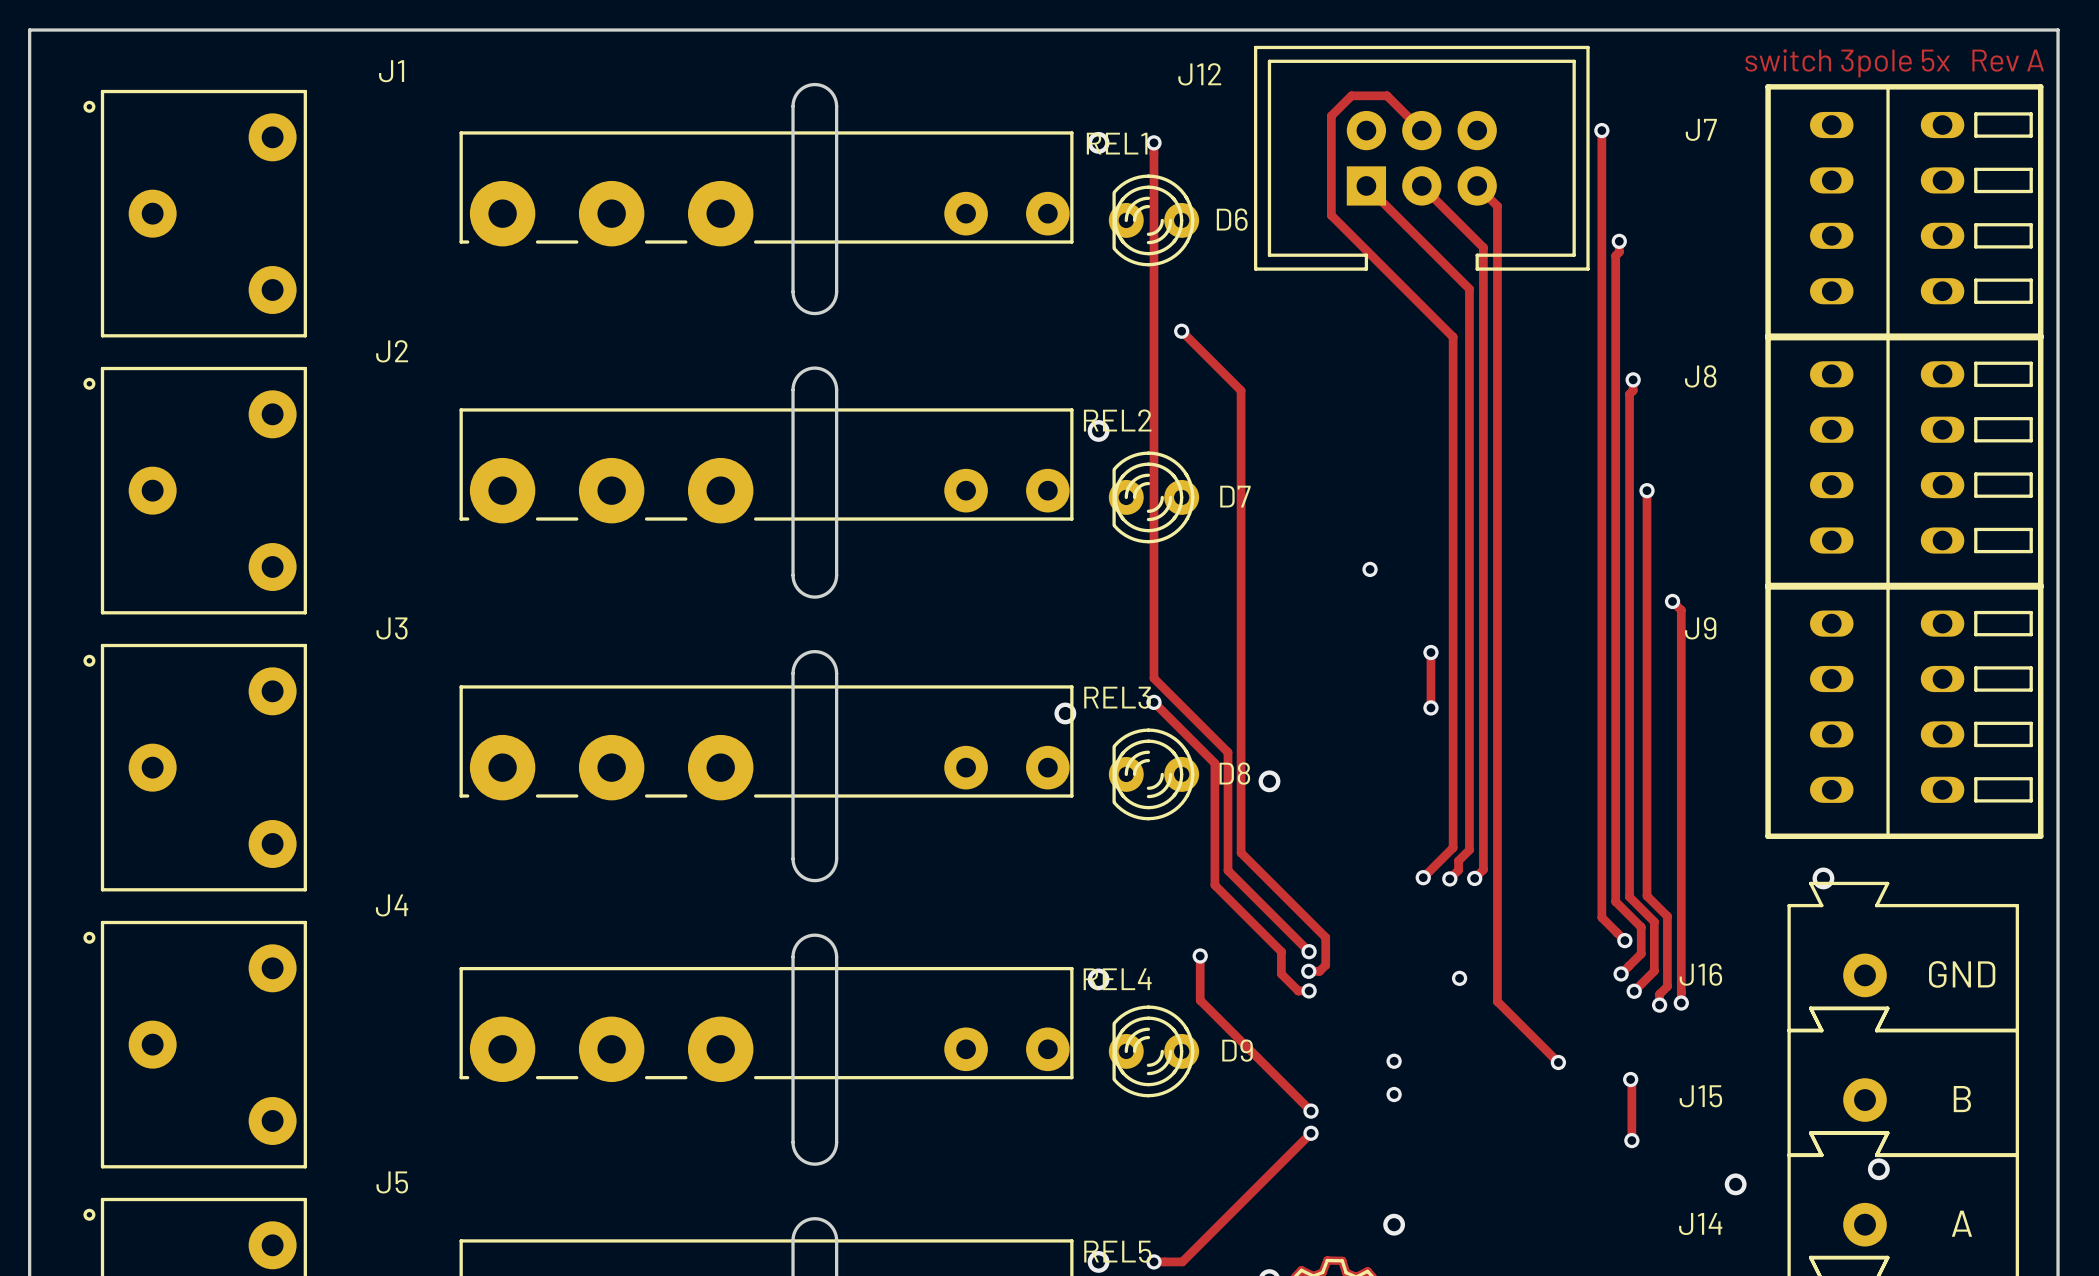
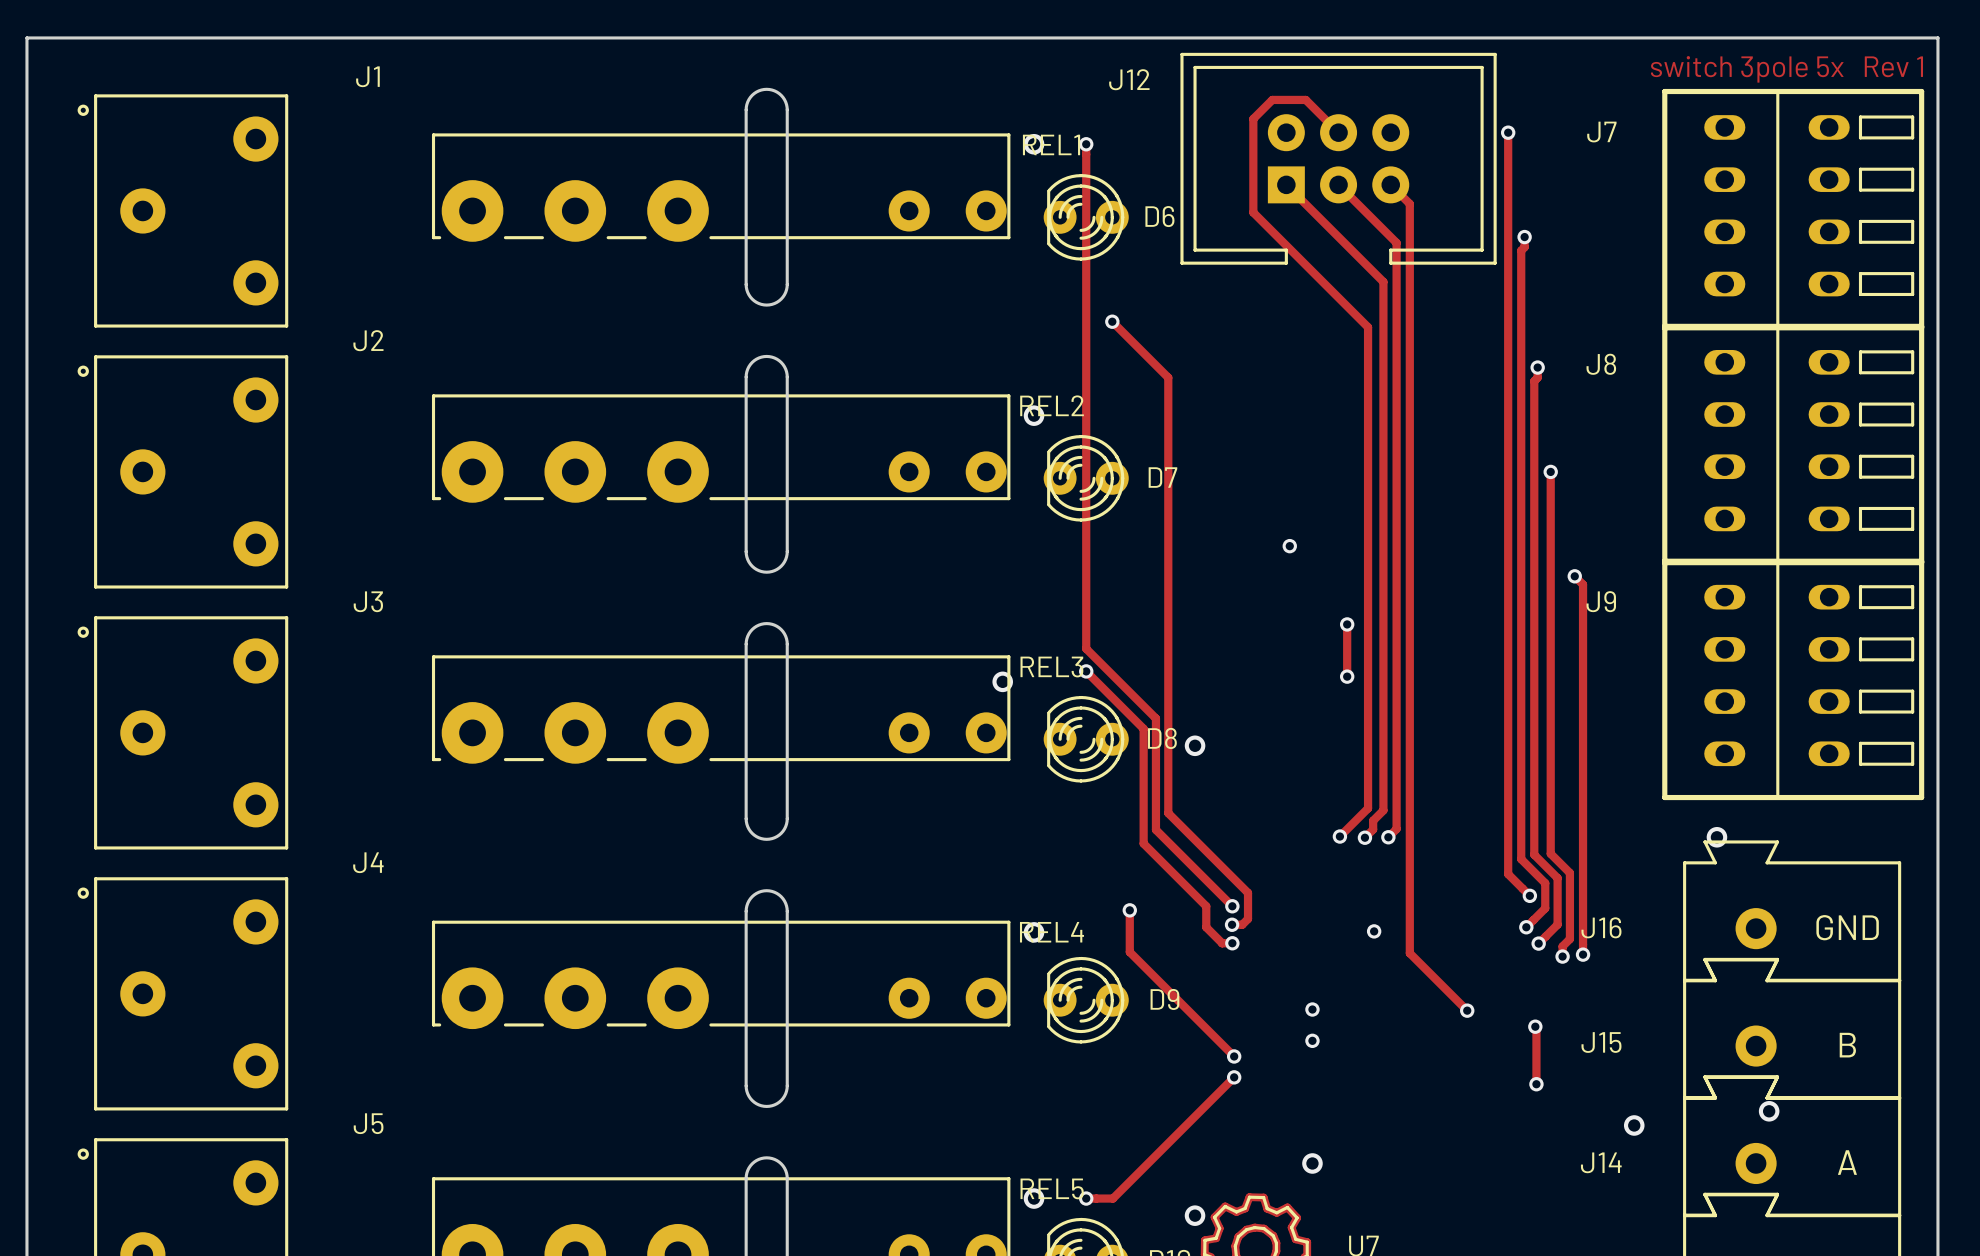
text: switch 3pole 5x Rev A (1894, 63) -> switch 3pole 5x Rev 1 (1786, 69)

